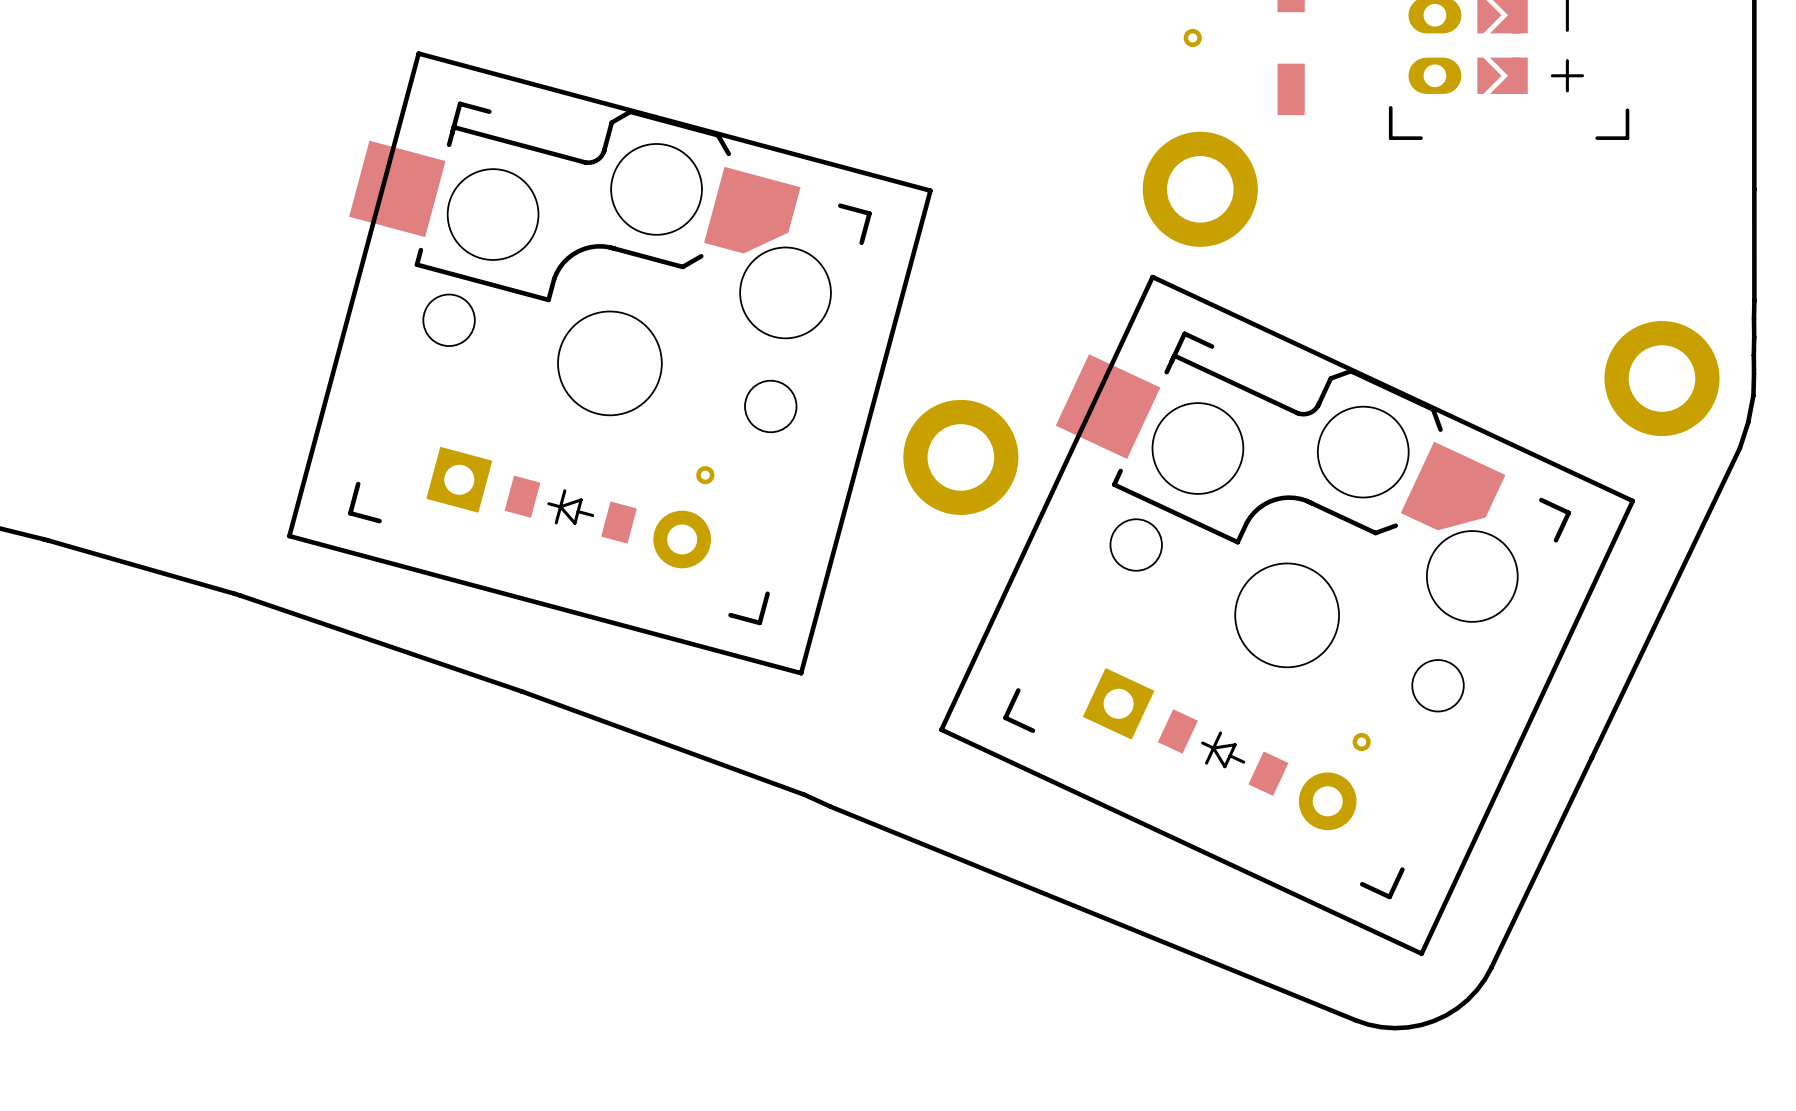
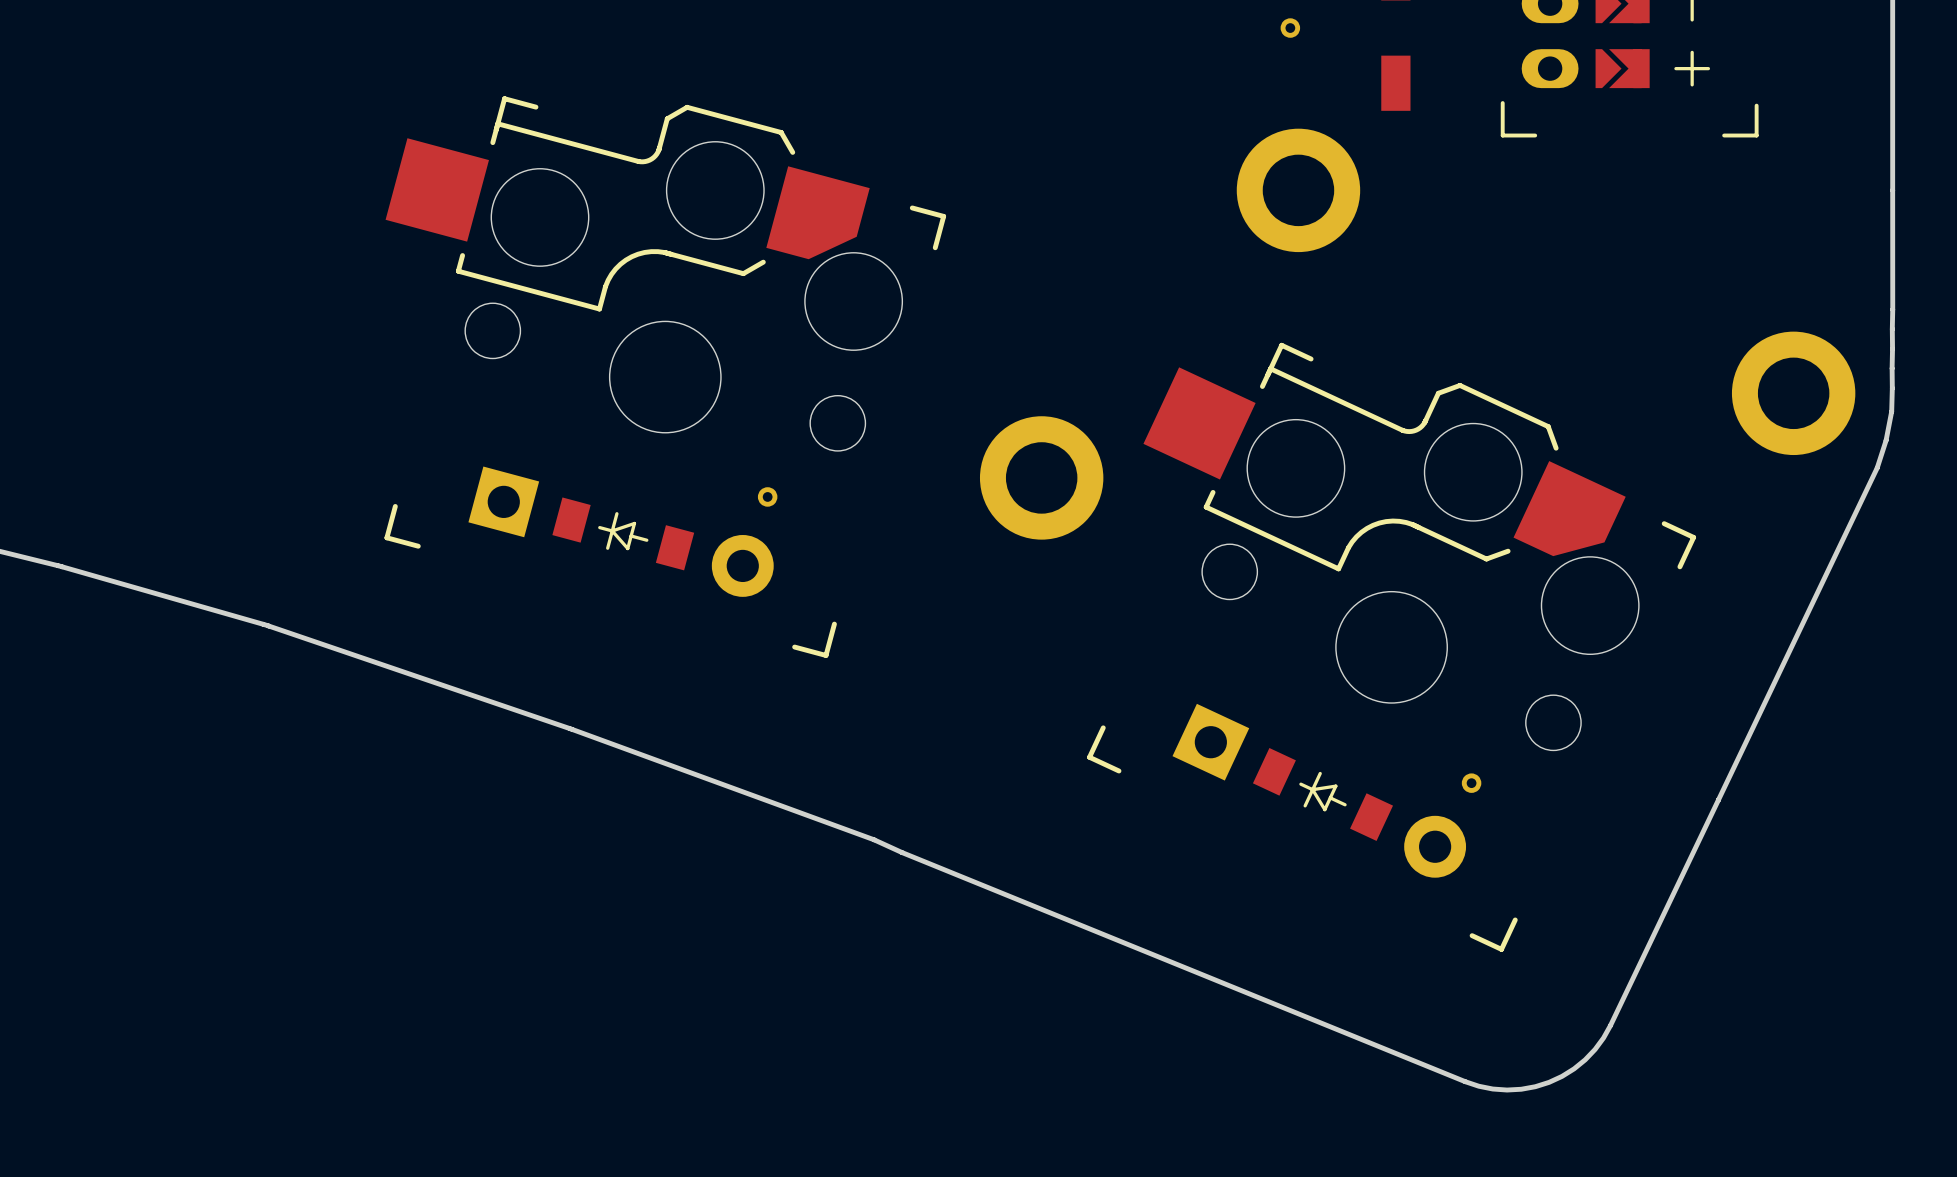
board edge: (418, 53) (930, 190) (801, 673) (289, 536) (418, 53) -> none
board edge: (1152, 277) (1632, 500) (1421, 953) (941, 729) (1152, 277) -> none

